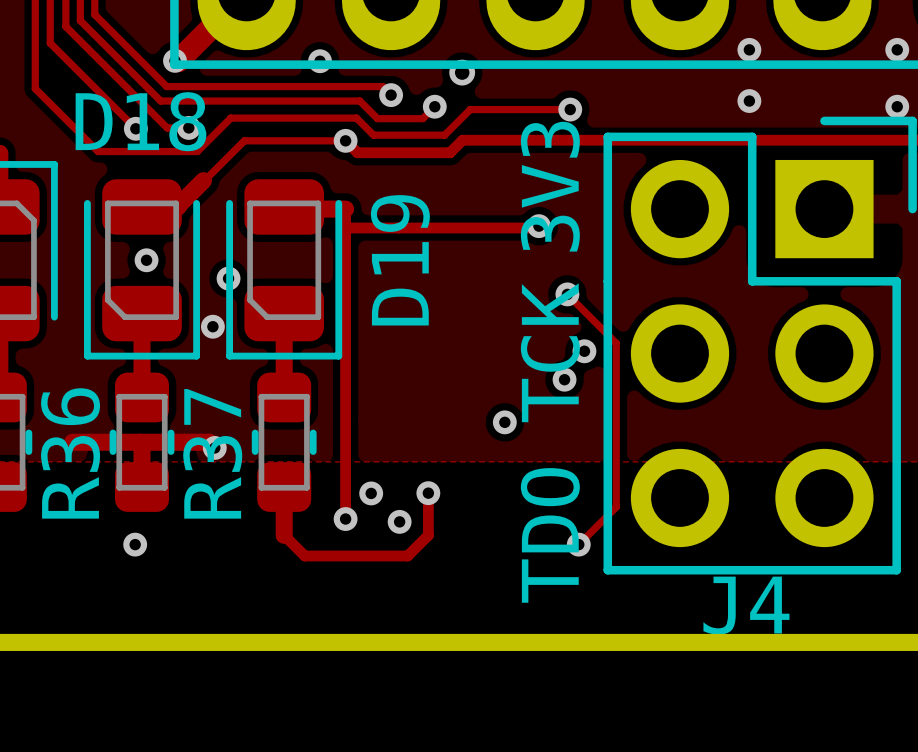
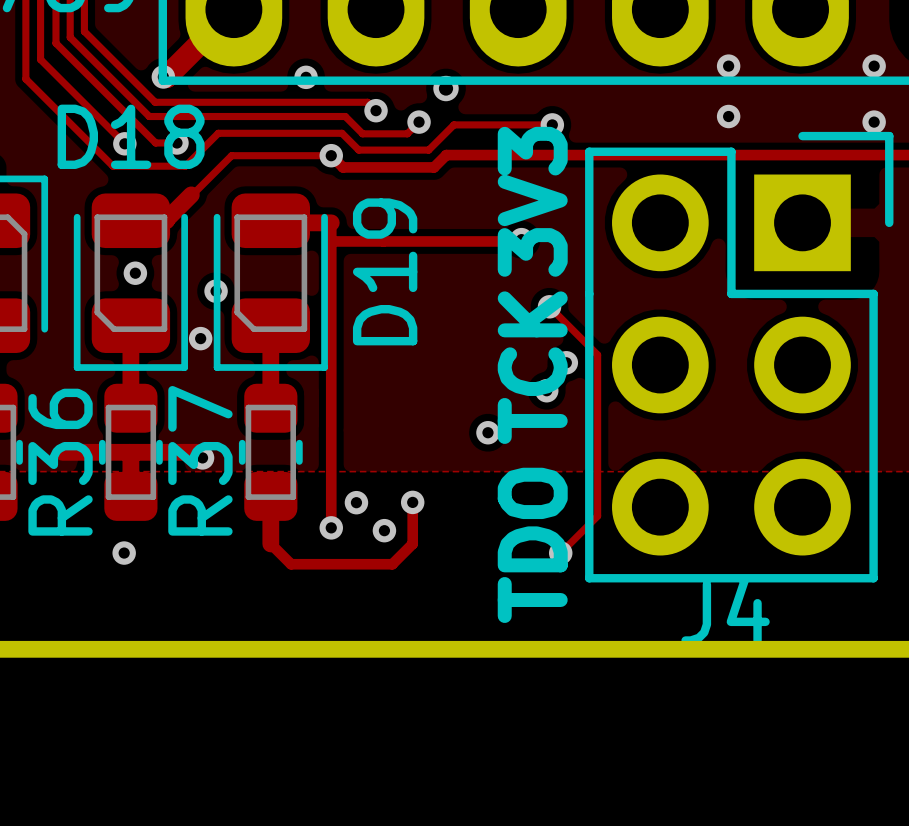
track: (35, 62) (35, 88) (98, 151) (123, 151) -> (25, 79) (113, 166)

